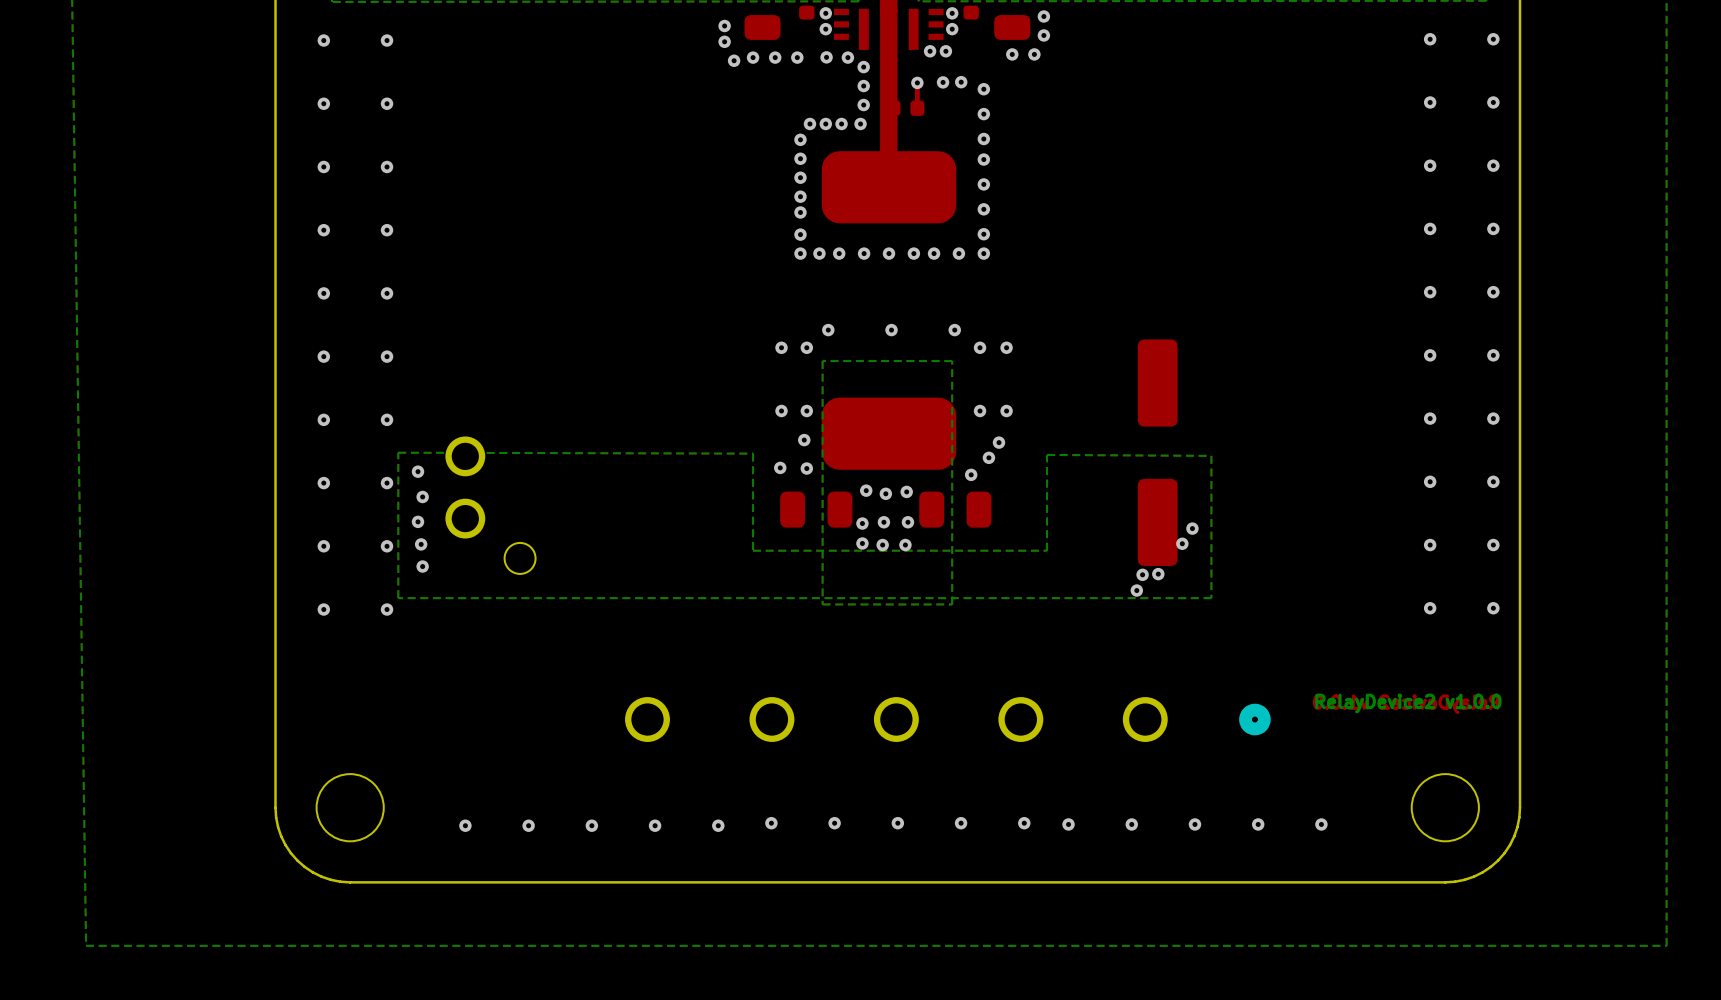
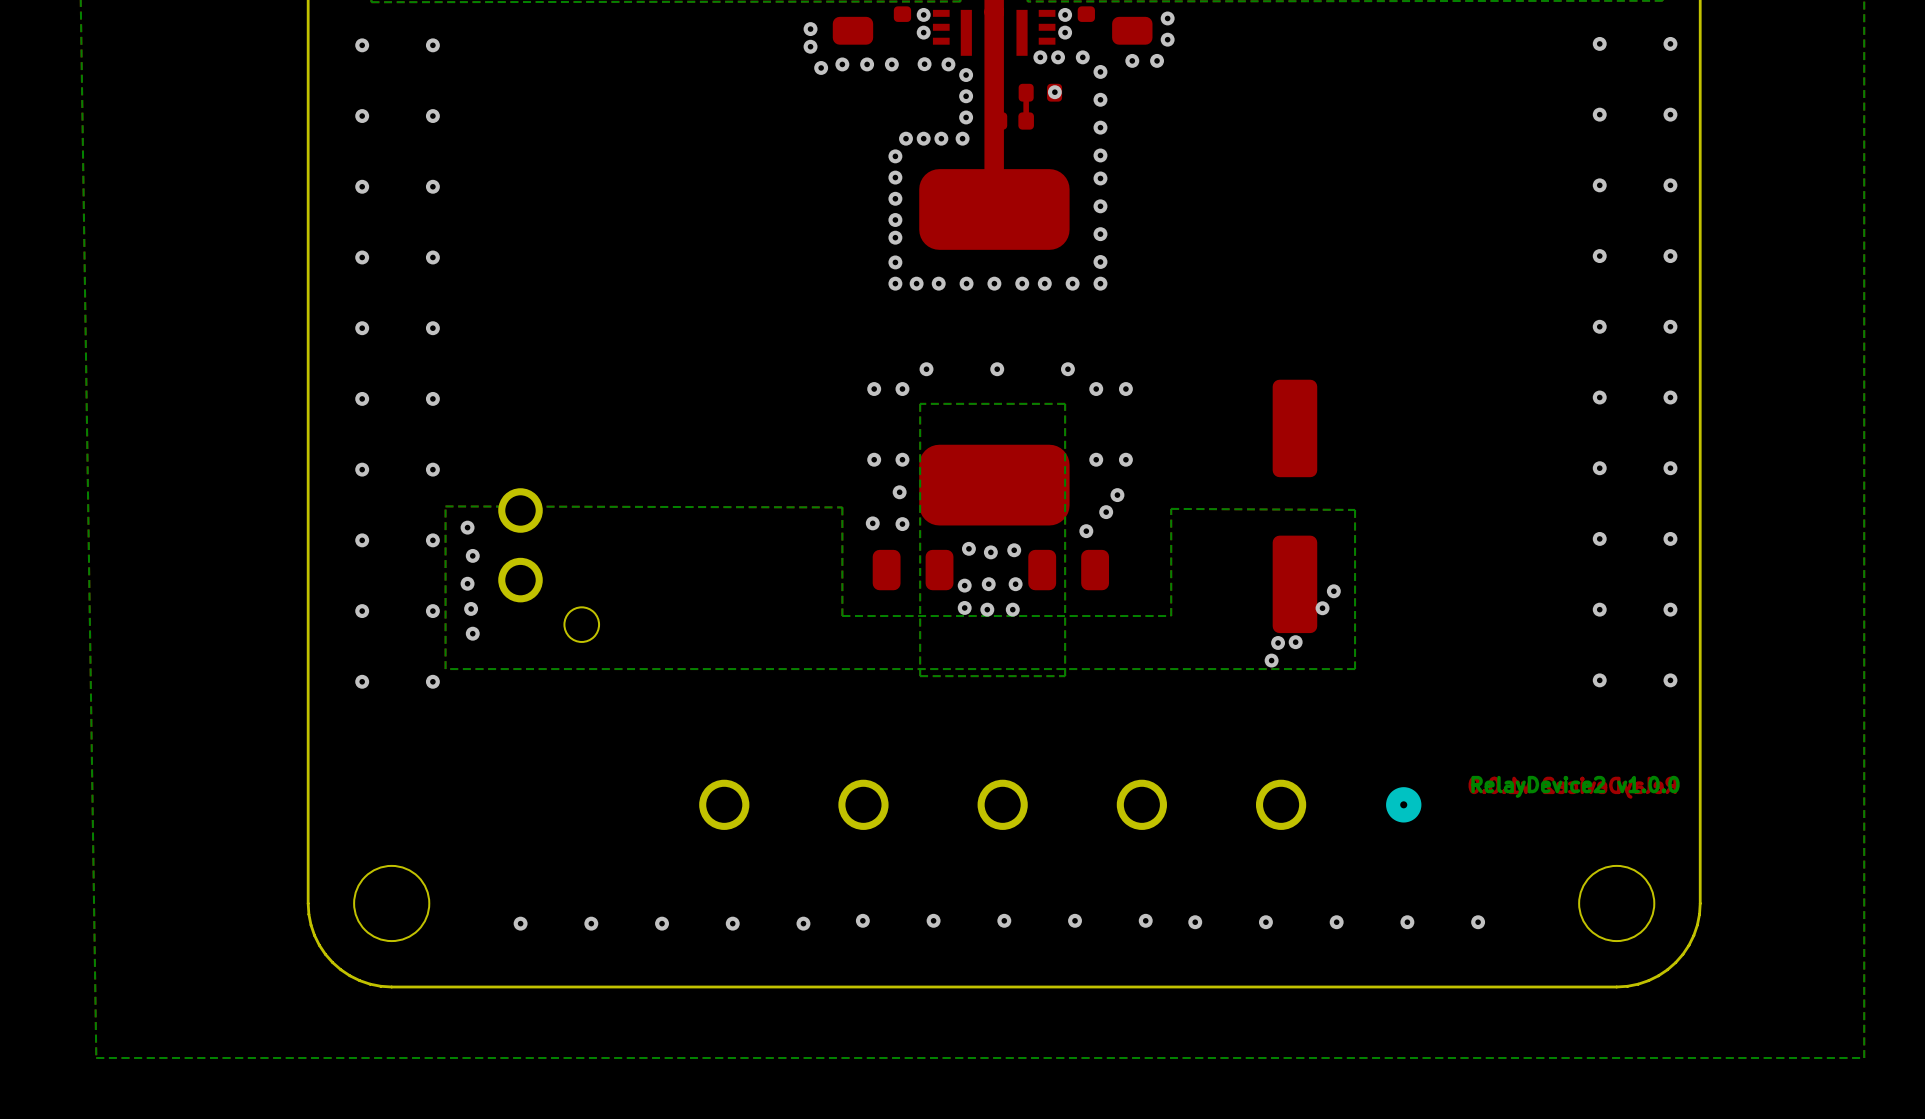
via: none -> (1082, 57)
via: none -> (1100, 71)
via: (917, 82) -> none
part: none -> (1040, 92)
via: (961, 82) -> none

